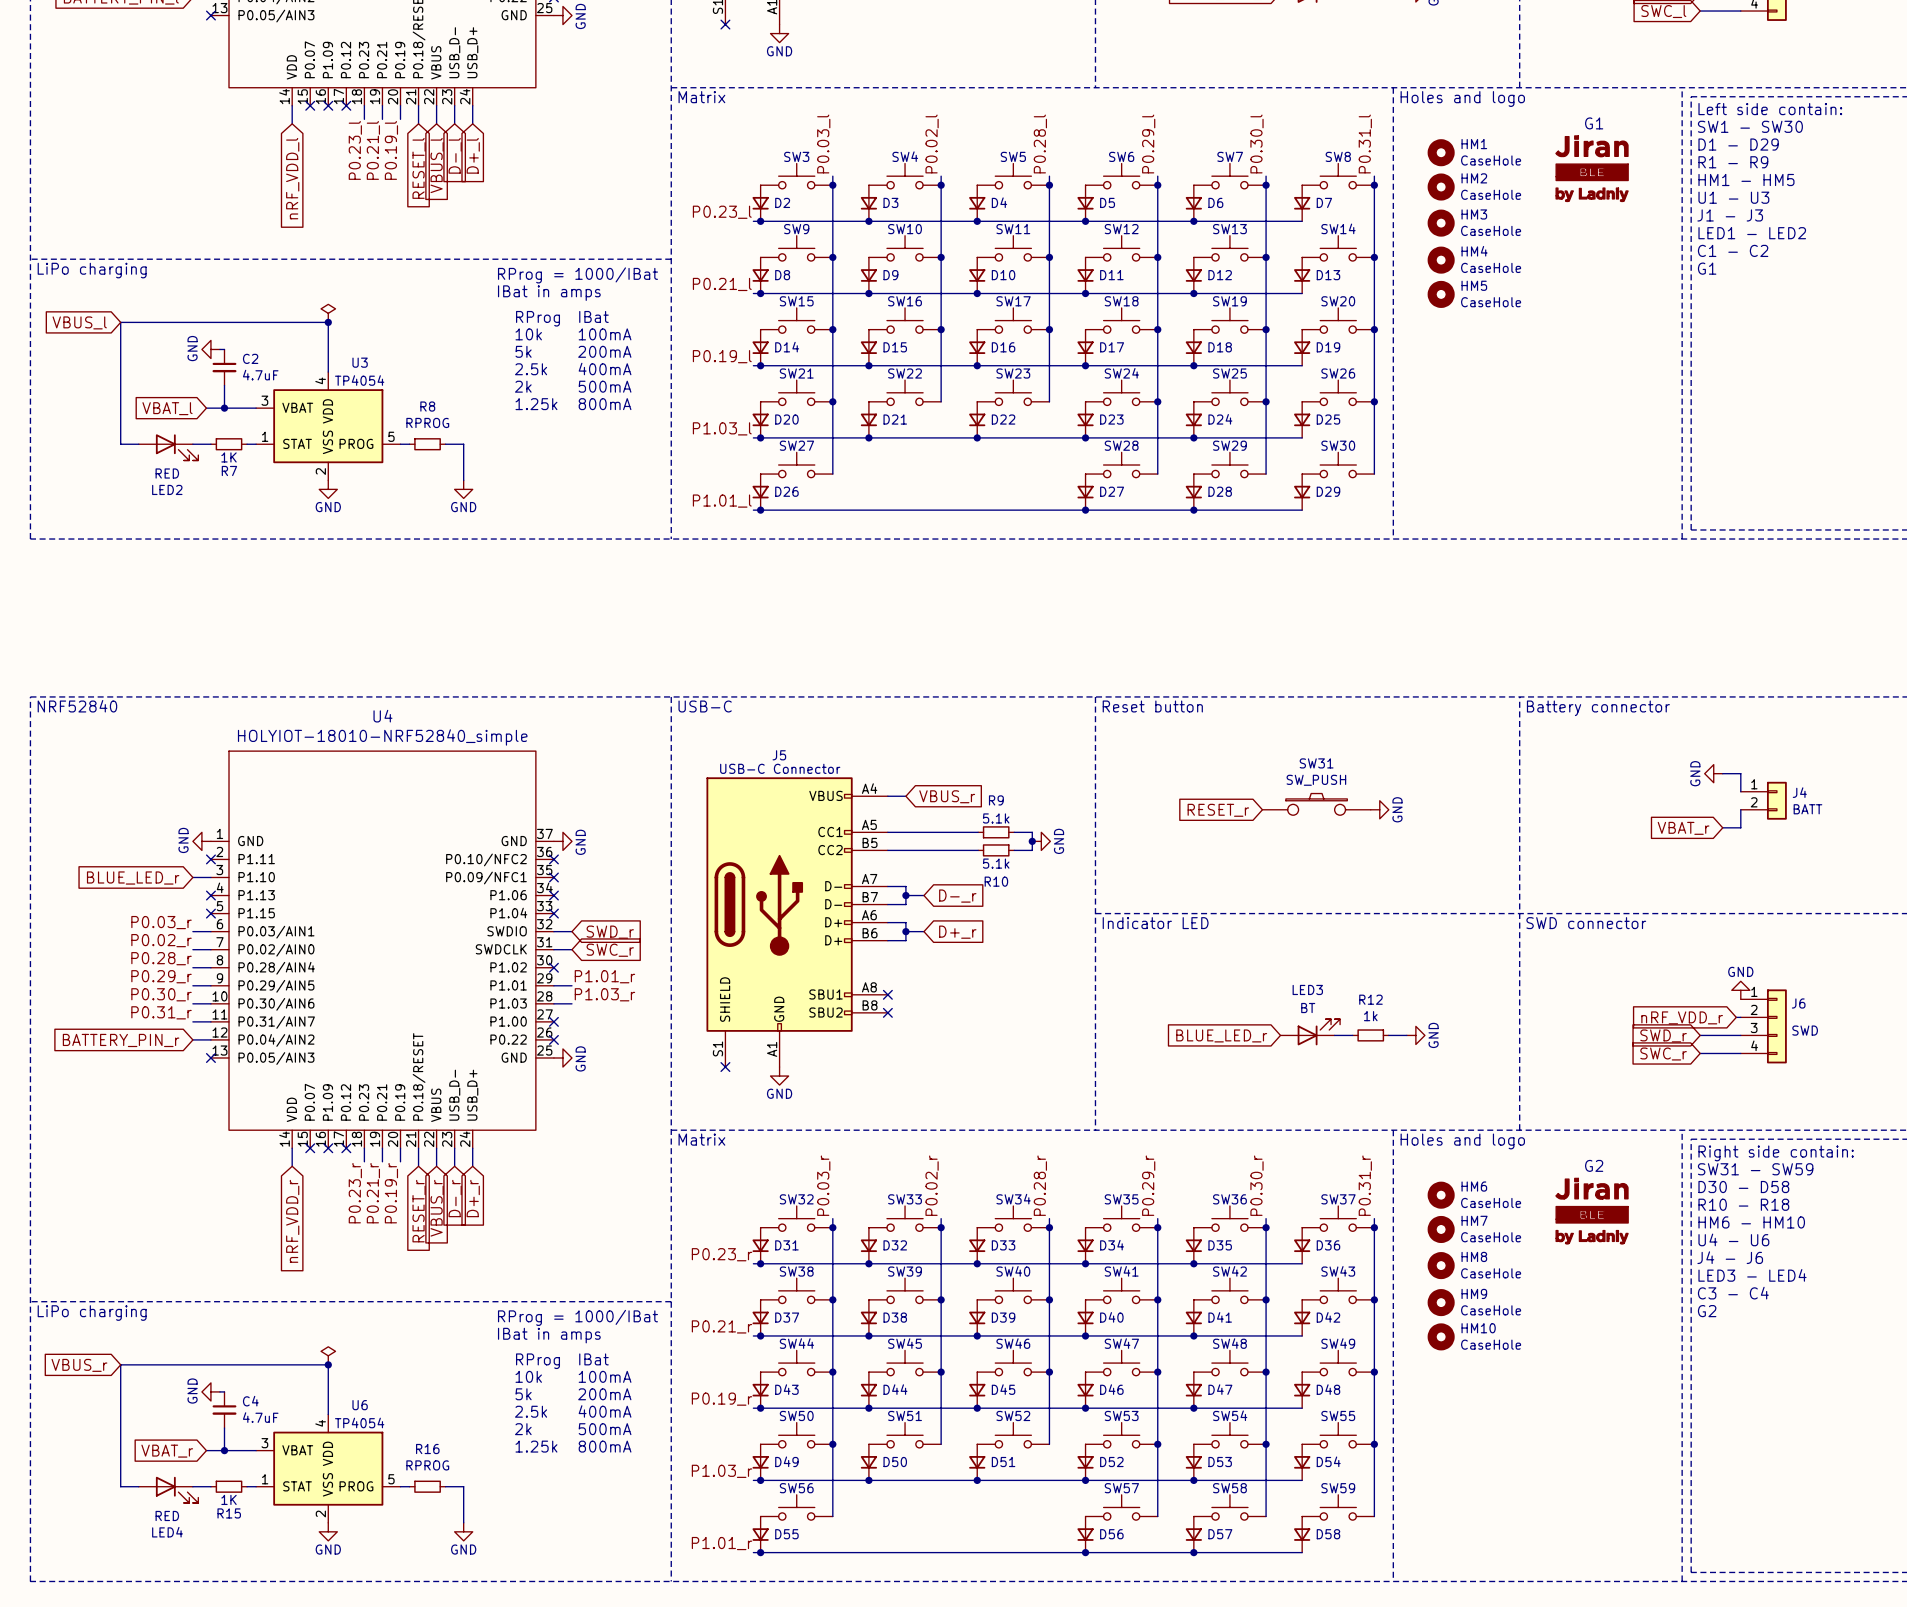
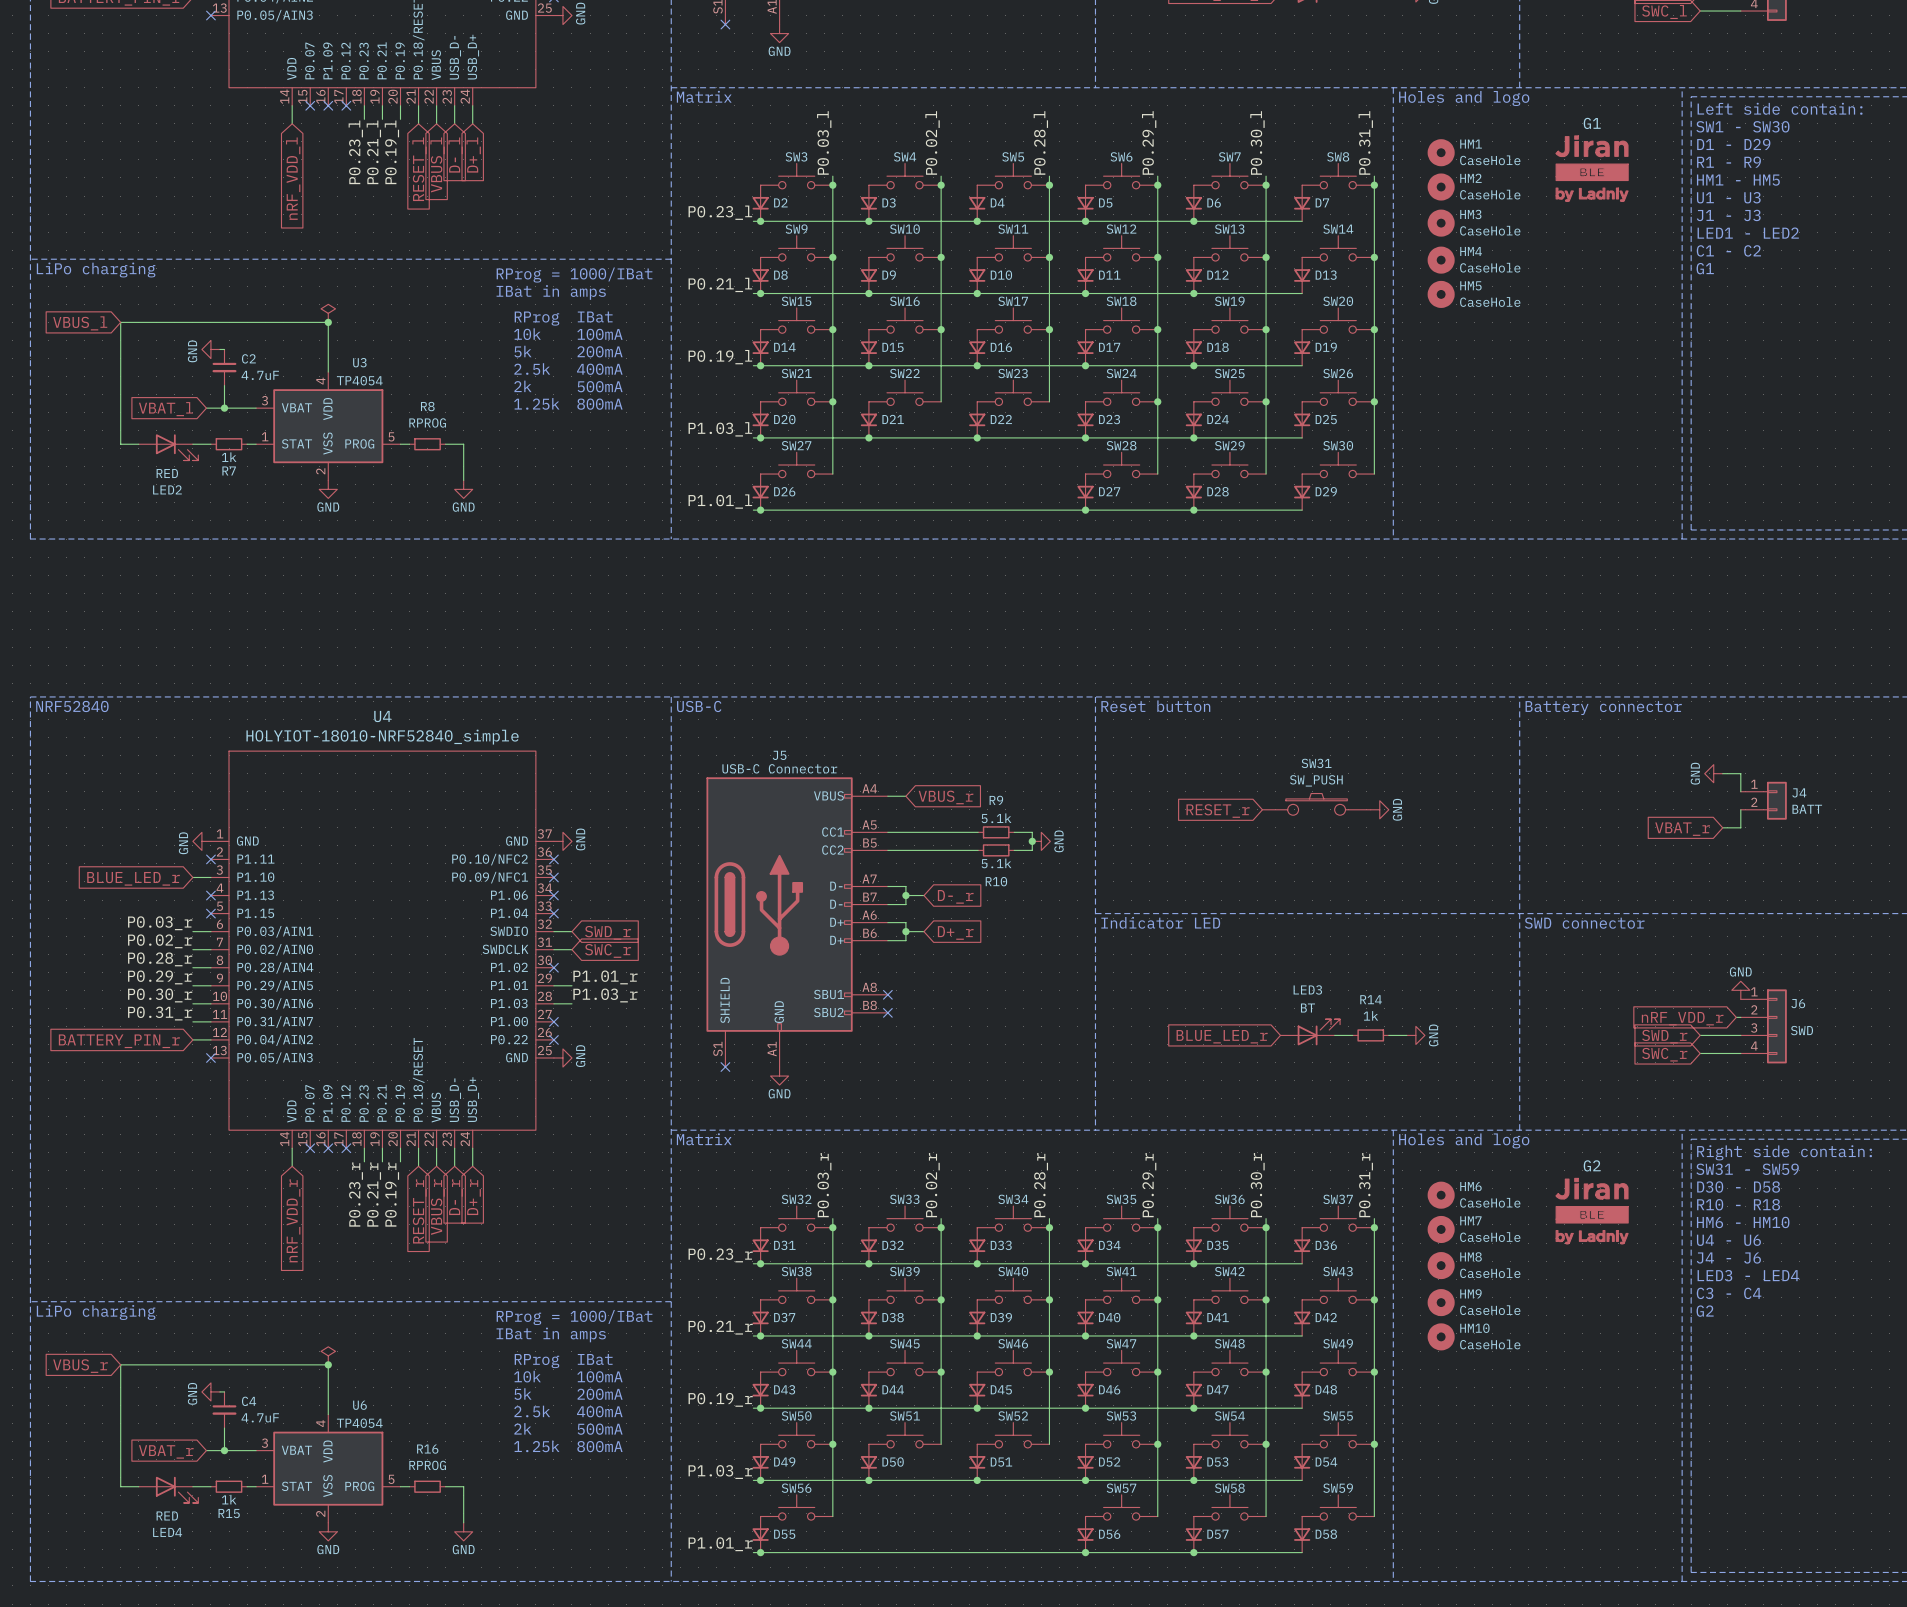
R7 value: 1K (229, 457) -> 1k (229, 457)
R12 name: R12 (1370, 999) -> R14 (1371, 999)
R15 value: 1K (229, 1499) -> 1k (229, 1499)

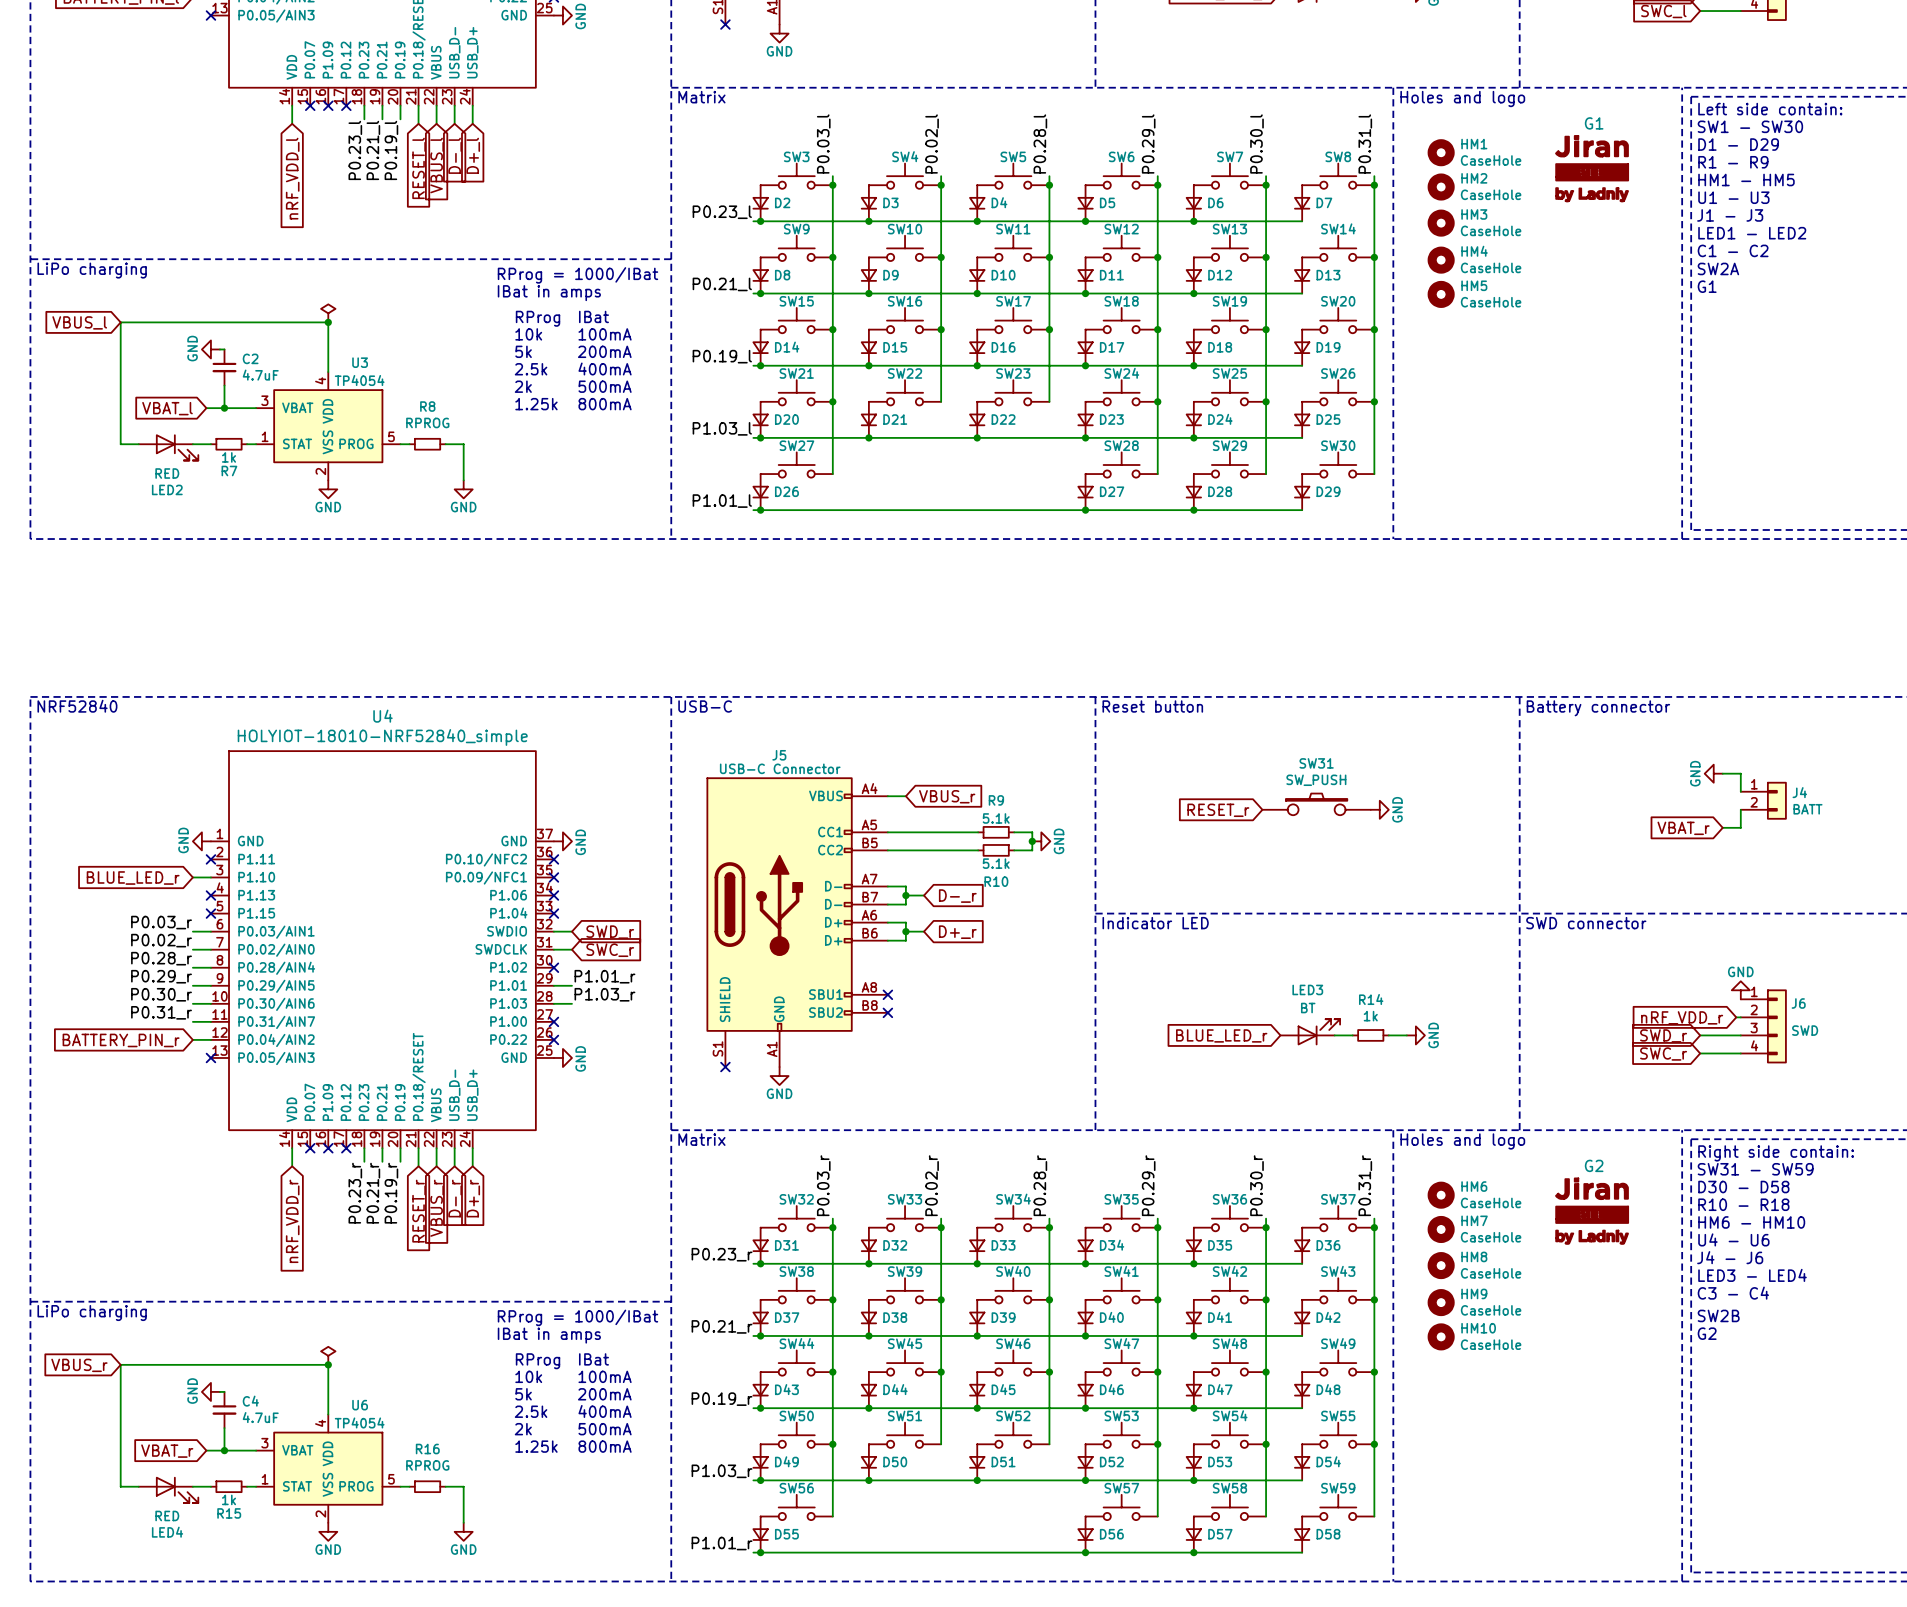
text: G1 (1705, 268) -> SW2A (1718, 268)
text: none -> G1 (1707, 286)
text: G2 (1705, 1311) -> SW2B (1718, 1315)
text: none -> G2 (1707, 1333)

